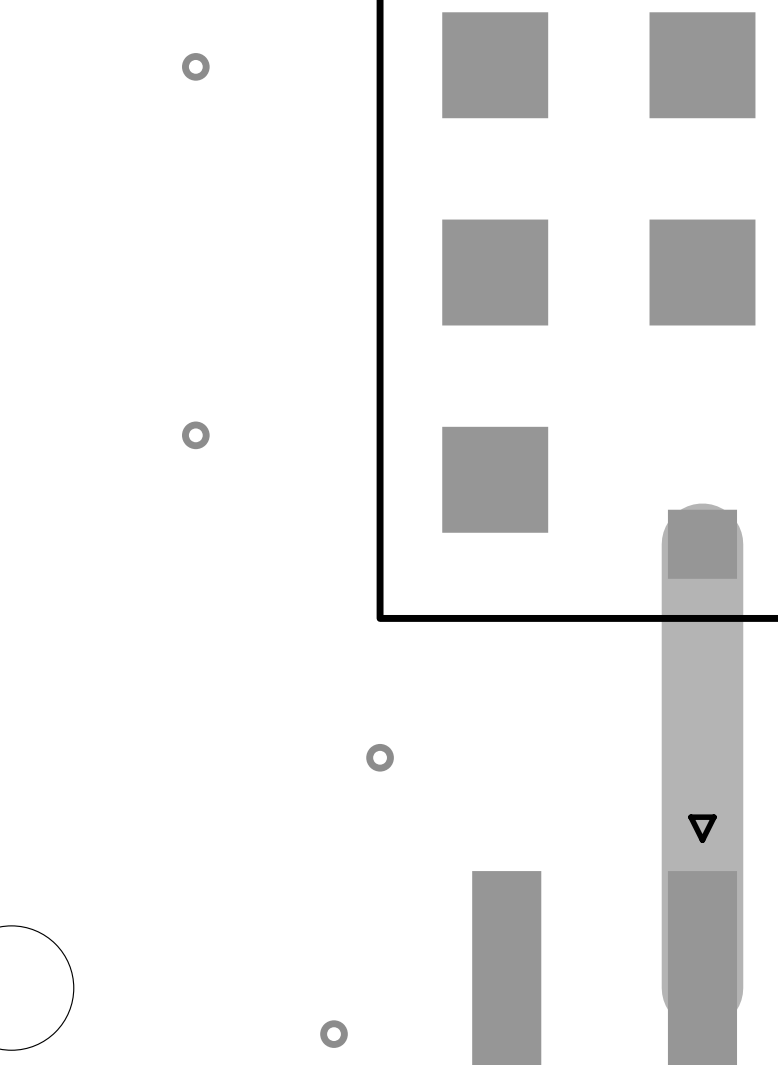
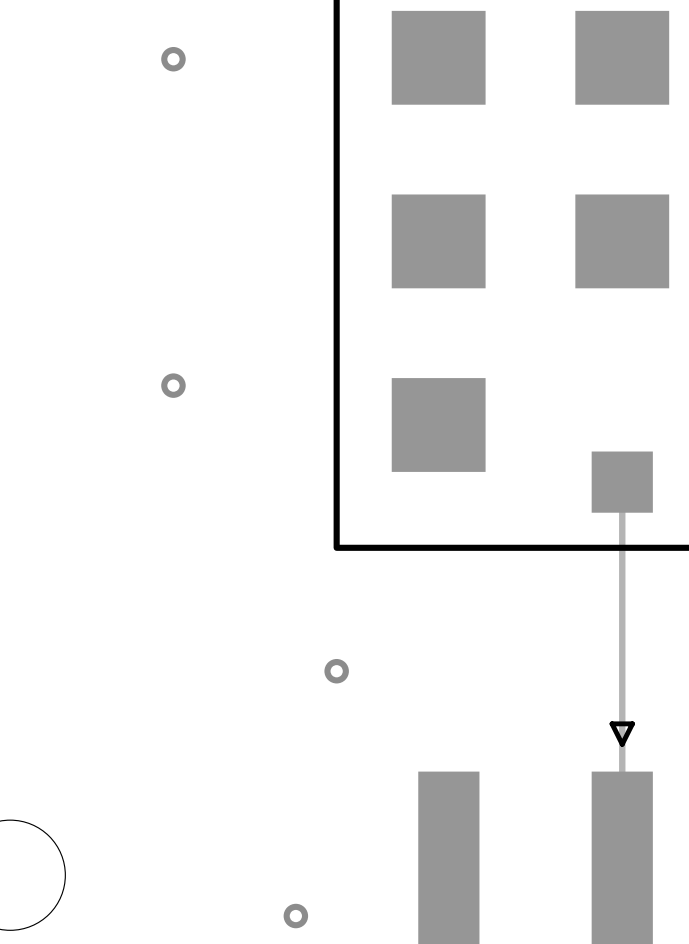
track width: thick (702, 544) (702, 988) -> thin (622, 482) (622, 875)

